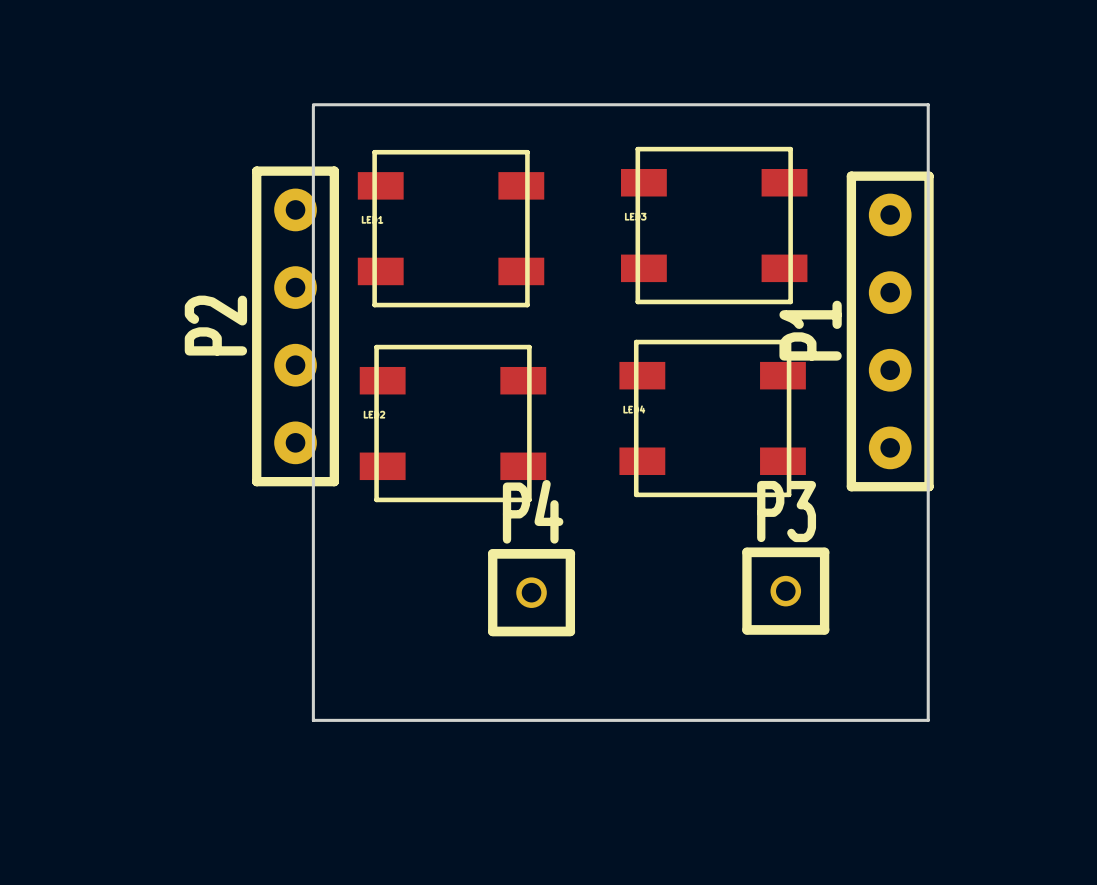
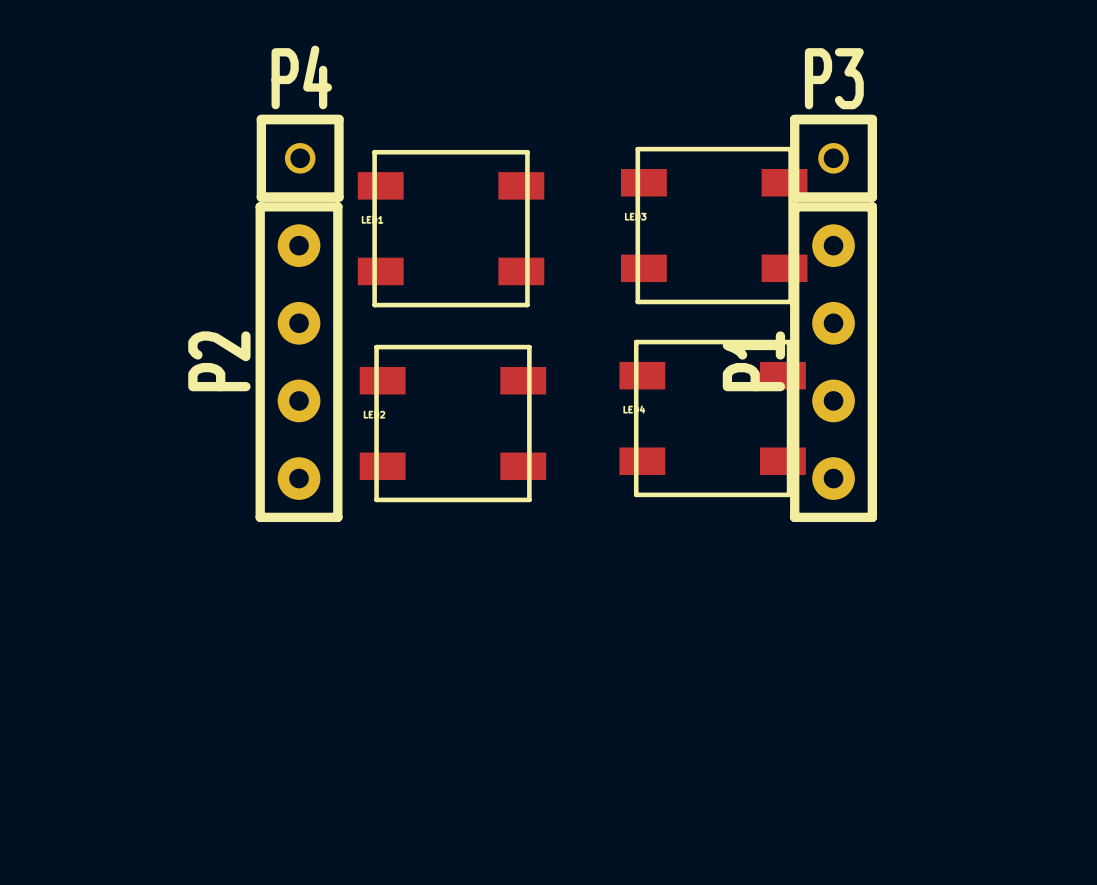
board edge: (313, 104) (928, 104) (928, 720) (313, 720) (313, 106) -> none
P2 position: (295, 326) -> (299, 362)
P1 position: (890, 331) -> (833, 362)
P3 position: (785, 591) -> (833, 158)
P4 position: (531, 592) -> (300, 158)

